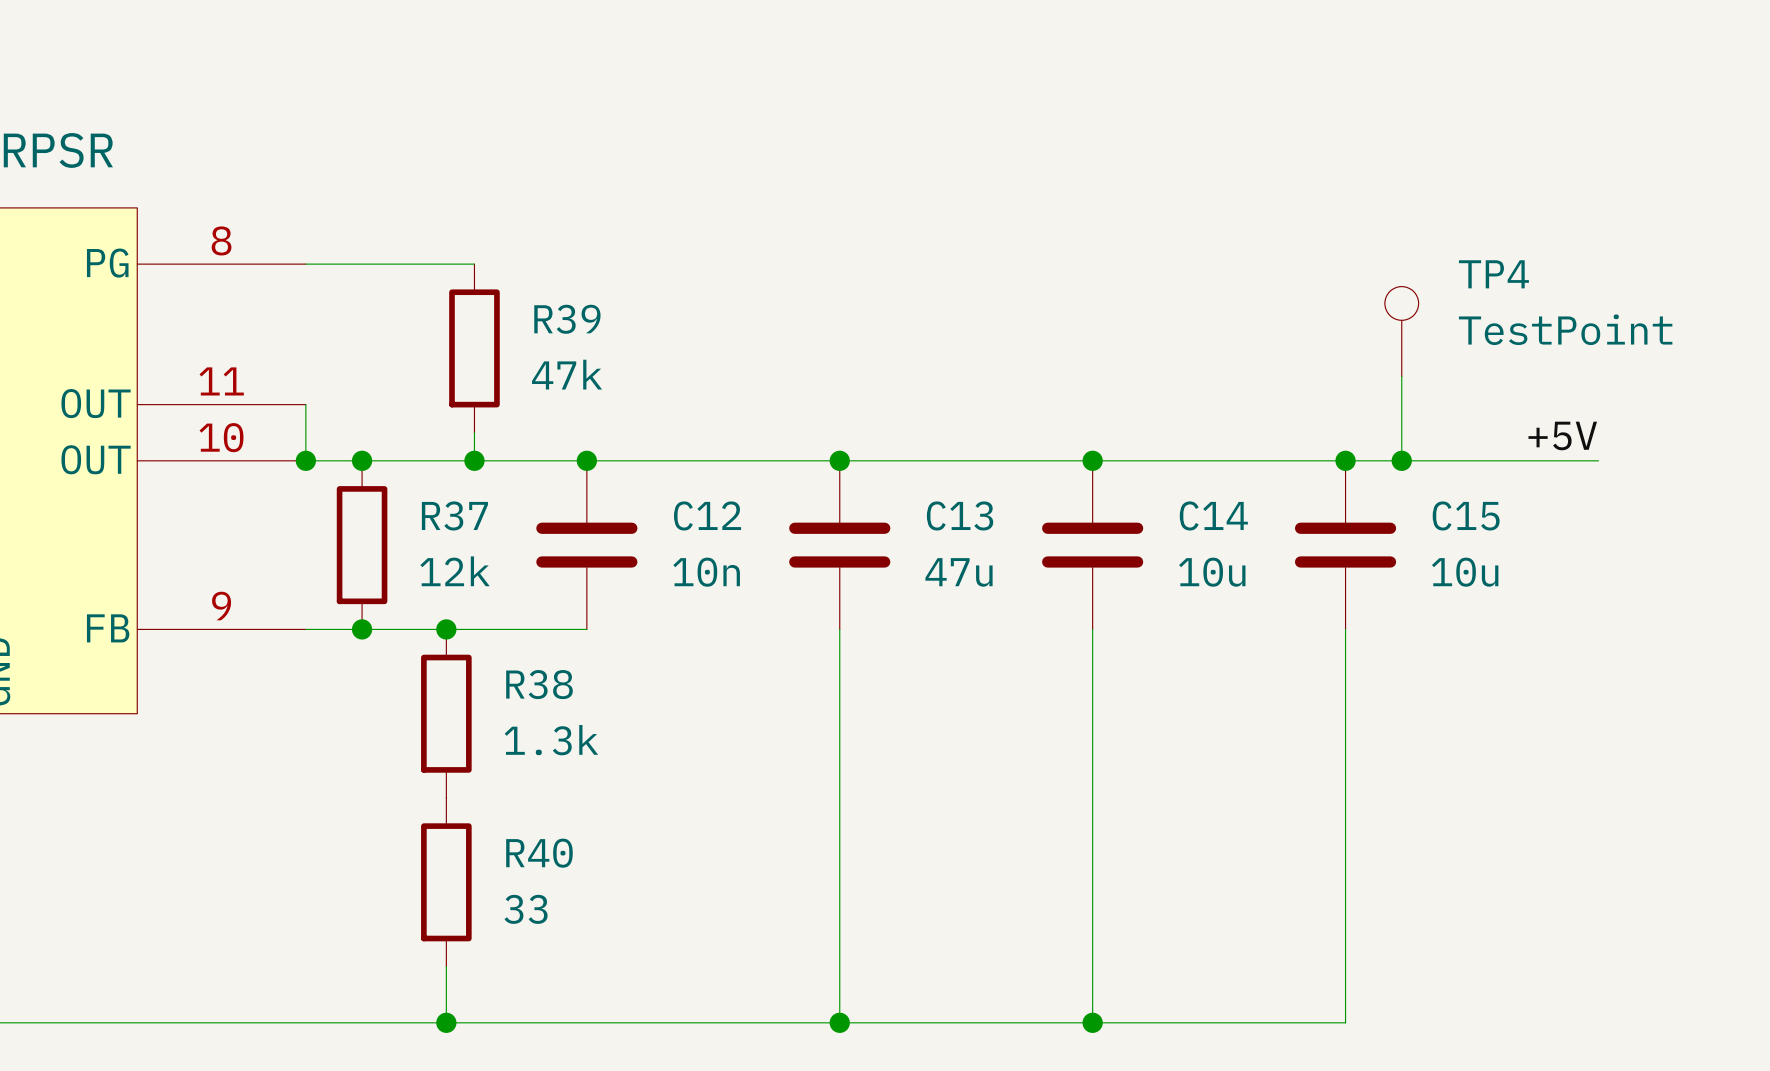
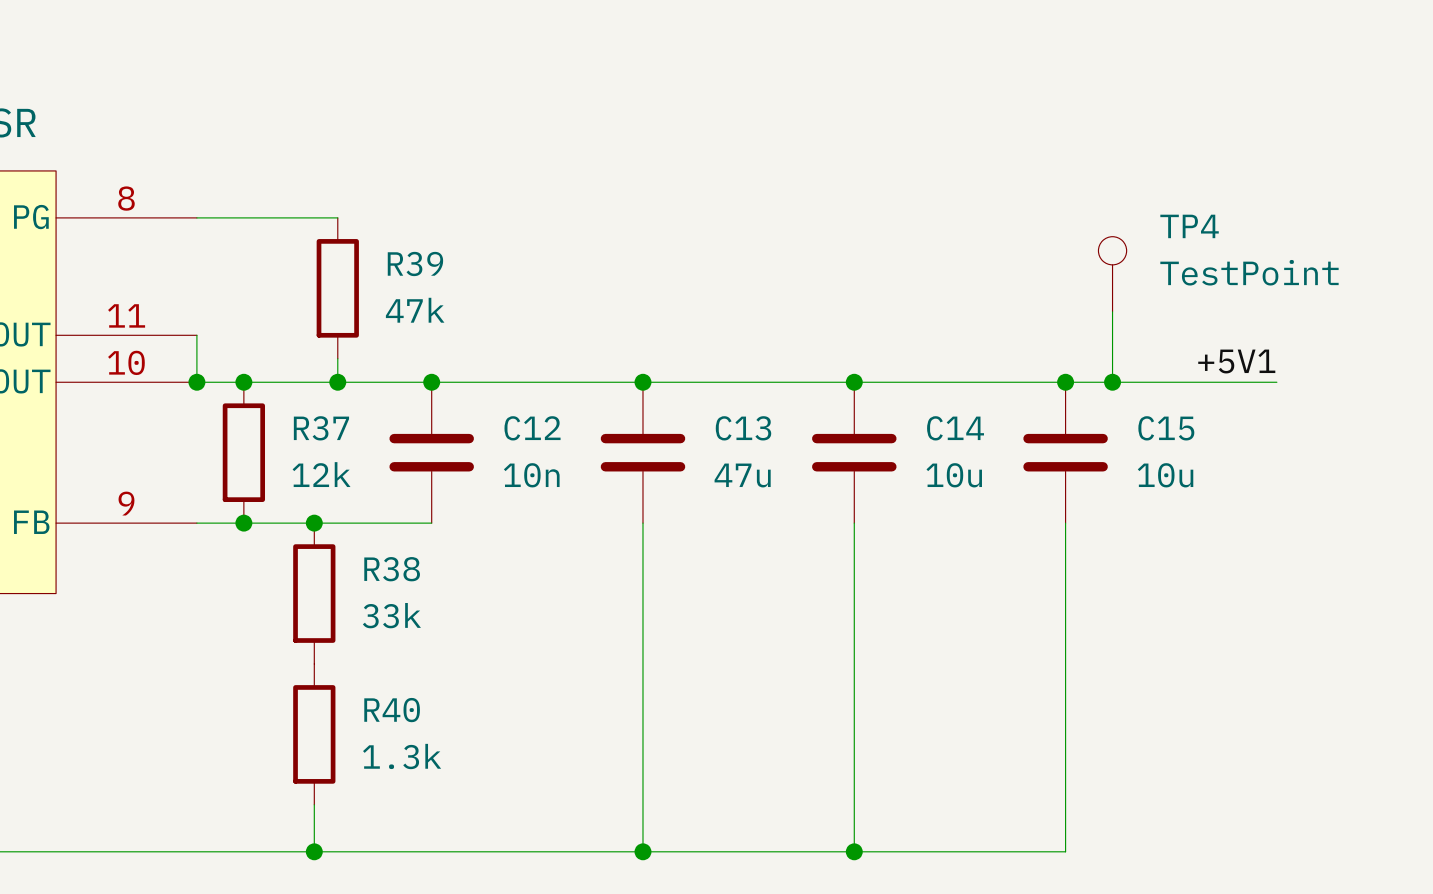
label: +5V (1562, 435) -> +5V1 (1236, 361)
R38 value: 1.3k (551, 740) -> 33k (391, 615)
R40 value: 33 (526, 909) -> 1.3k (402, 756)

